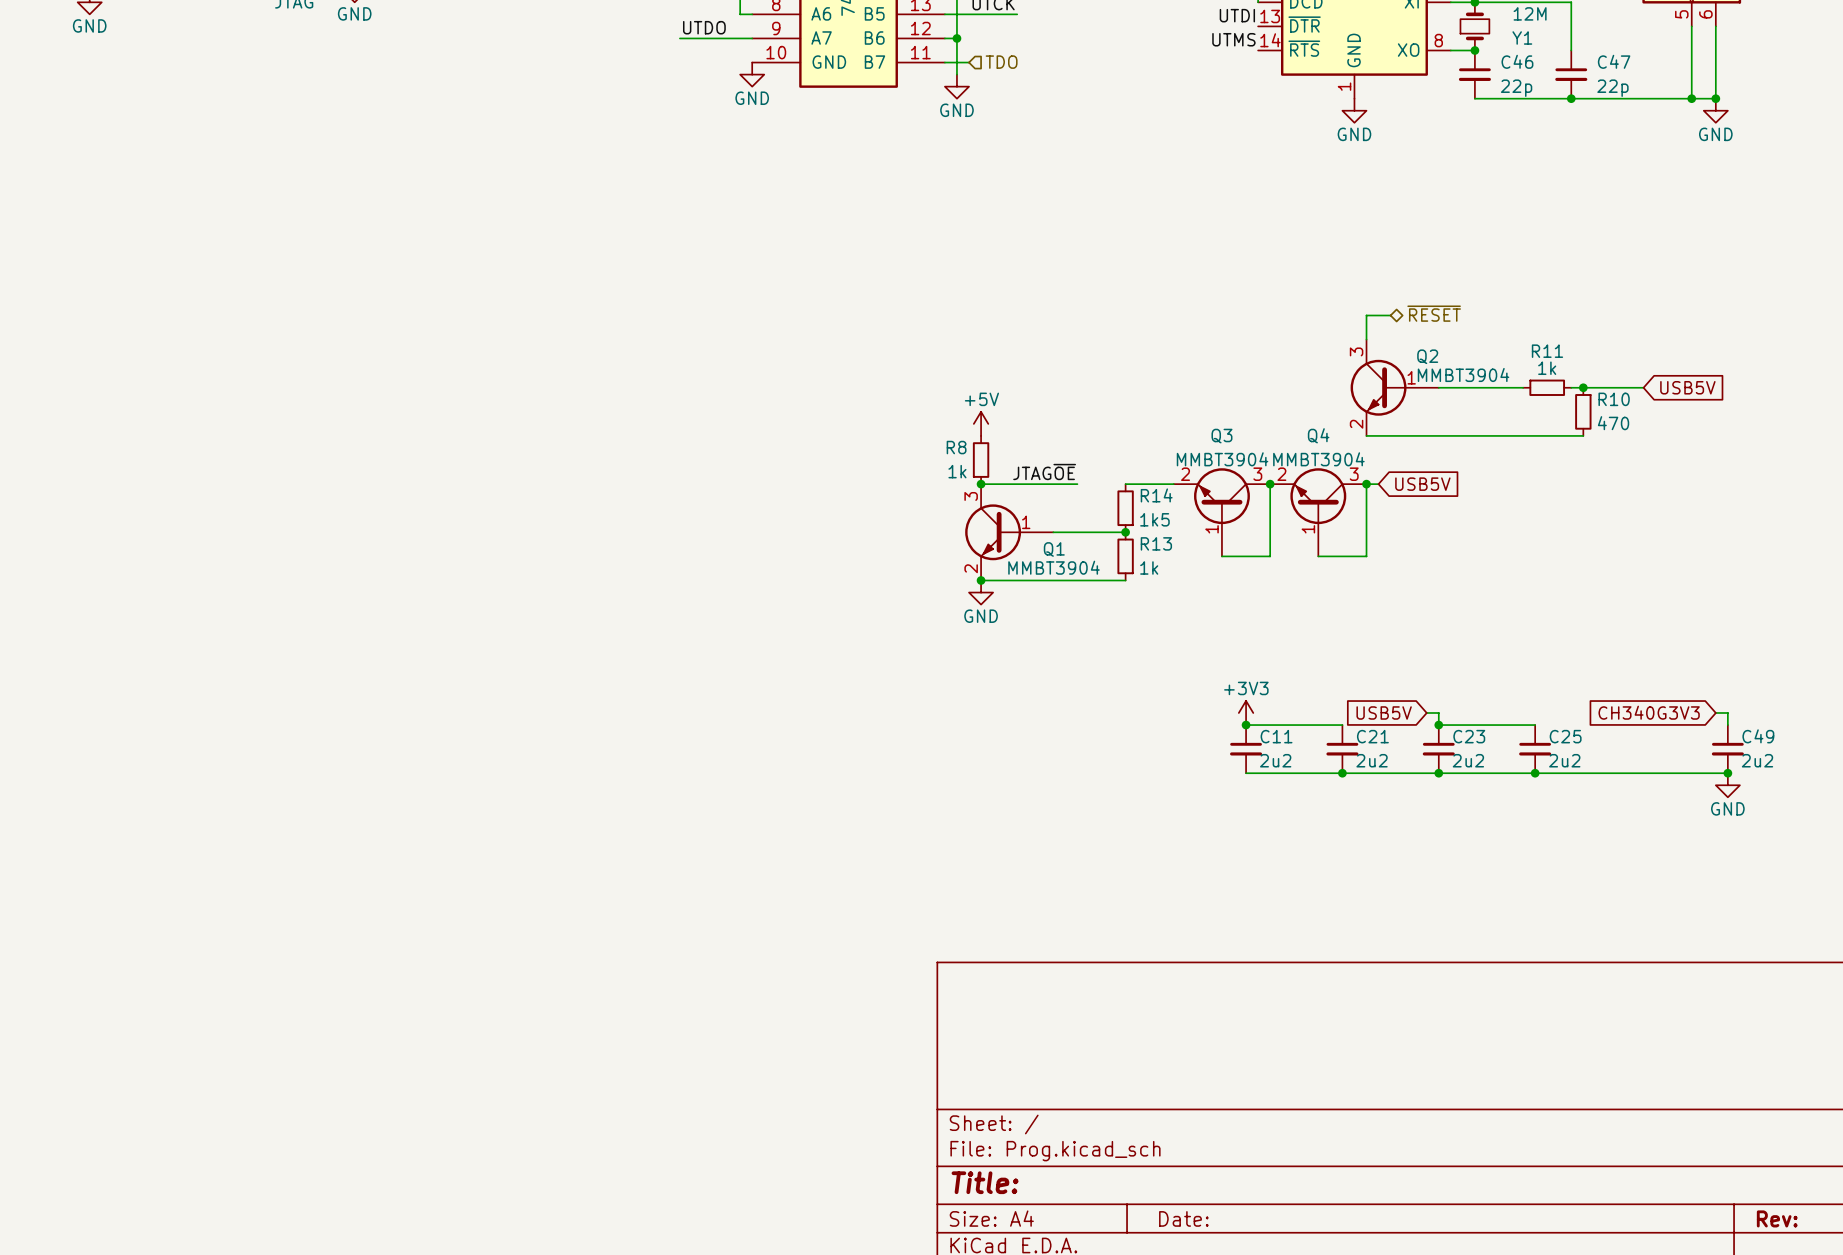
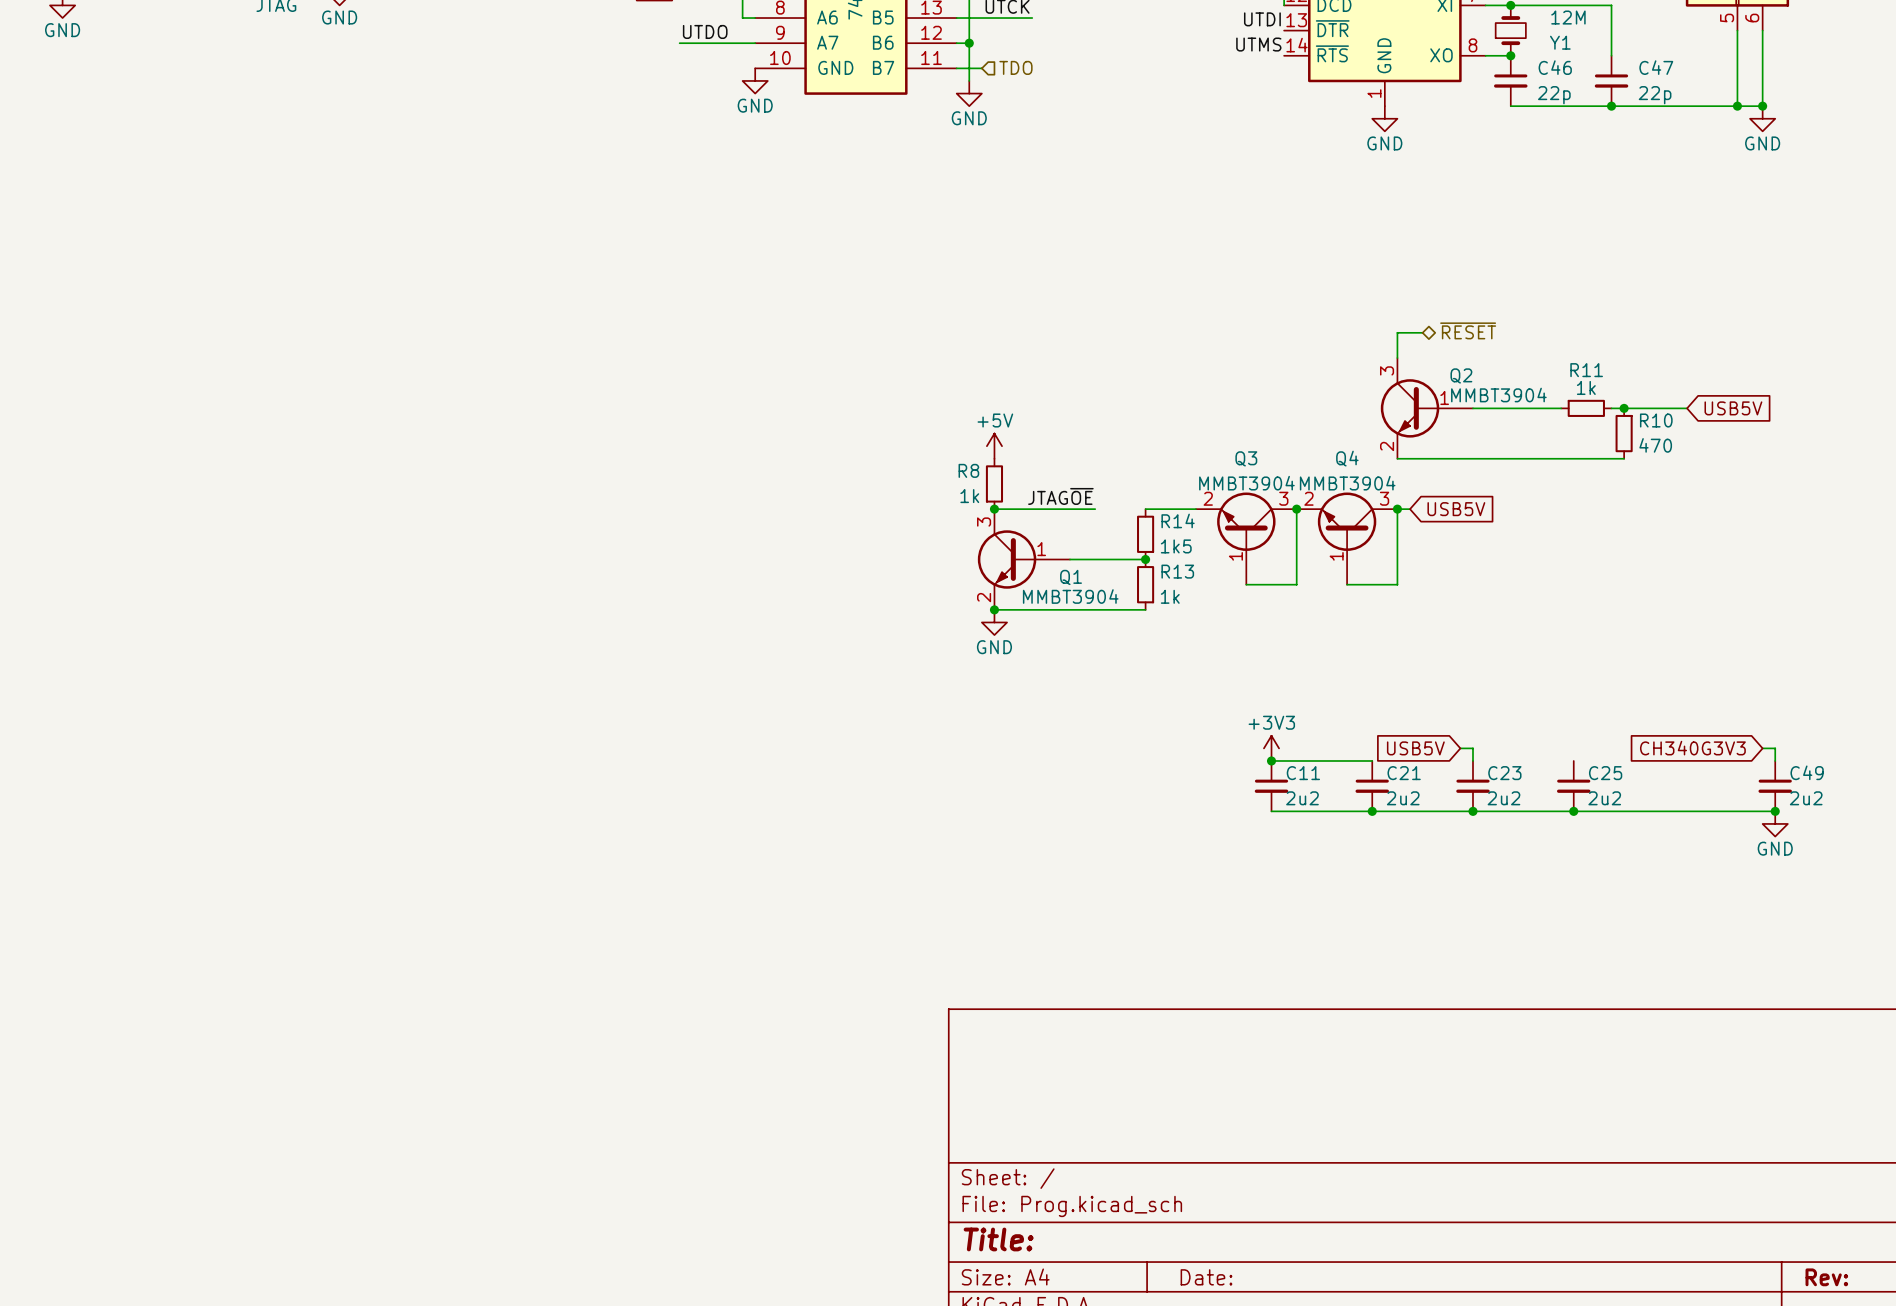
wire: (1438, 725) (1535, 725) -> none
junction: (1438, 725) -> none

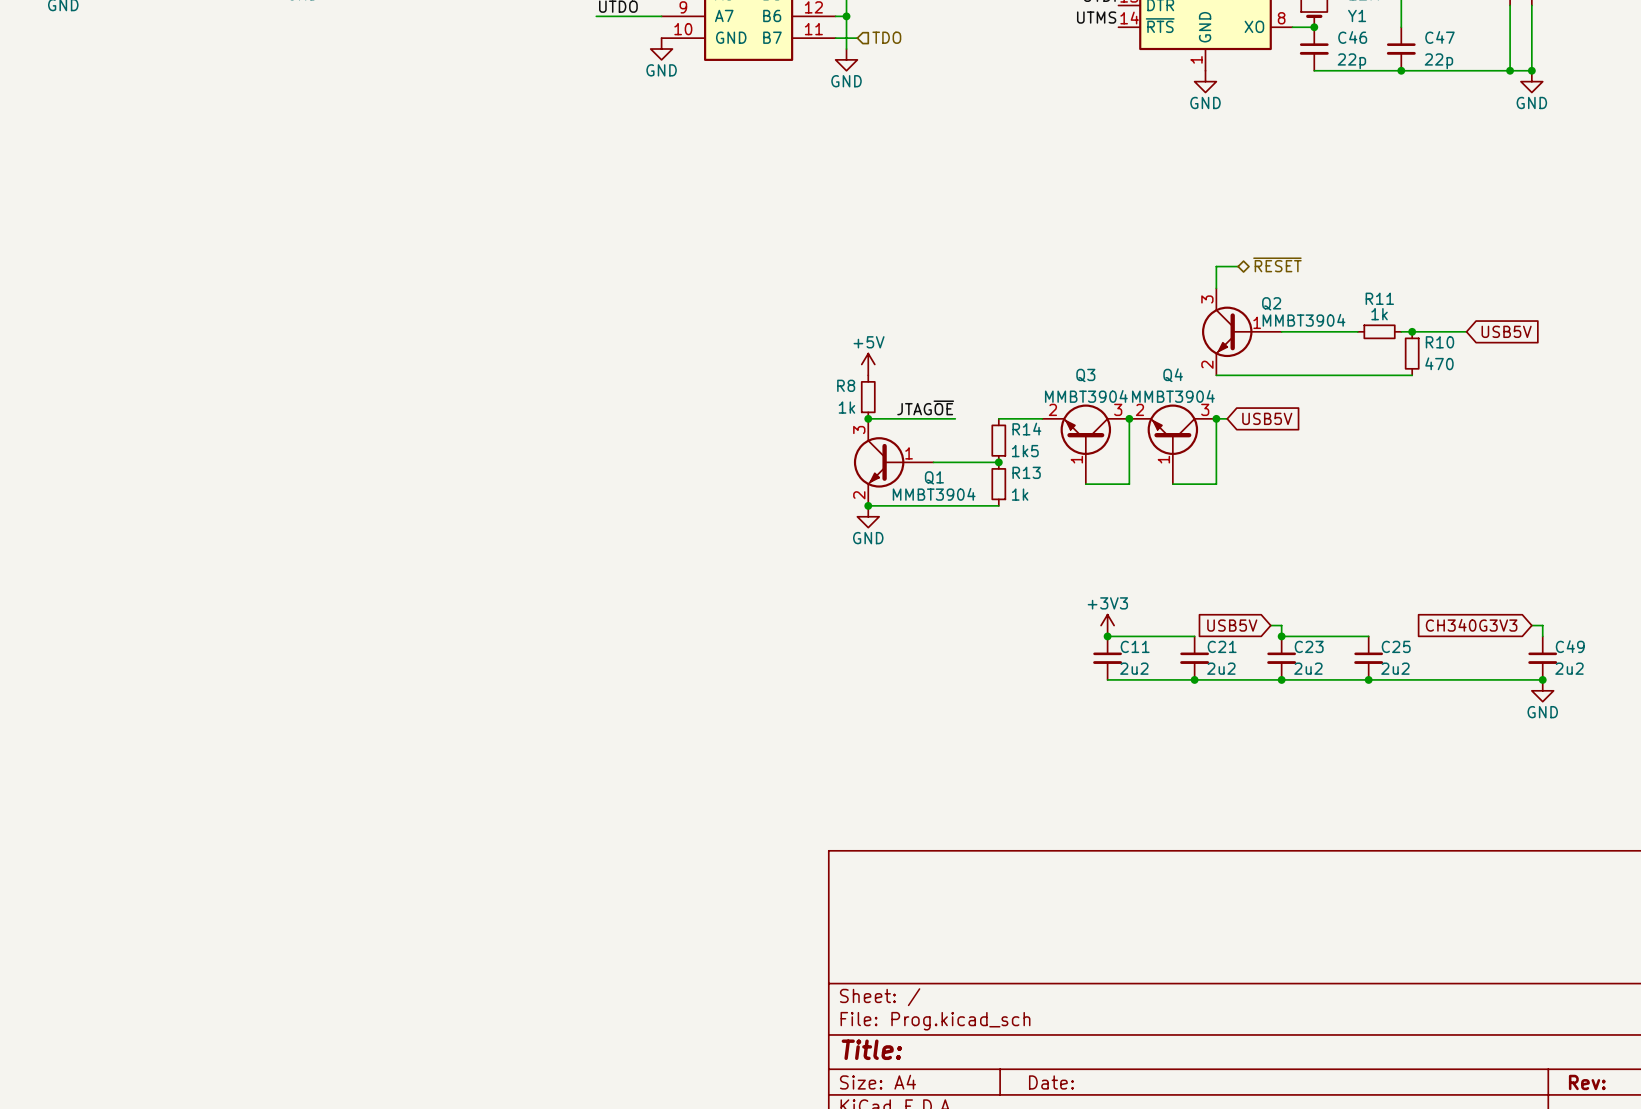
wire: none -> (1281, 636) (1368, 636)
junction: none -> (1281, 636)

